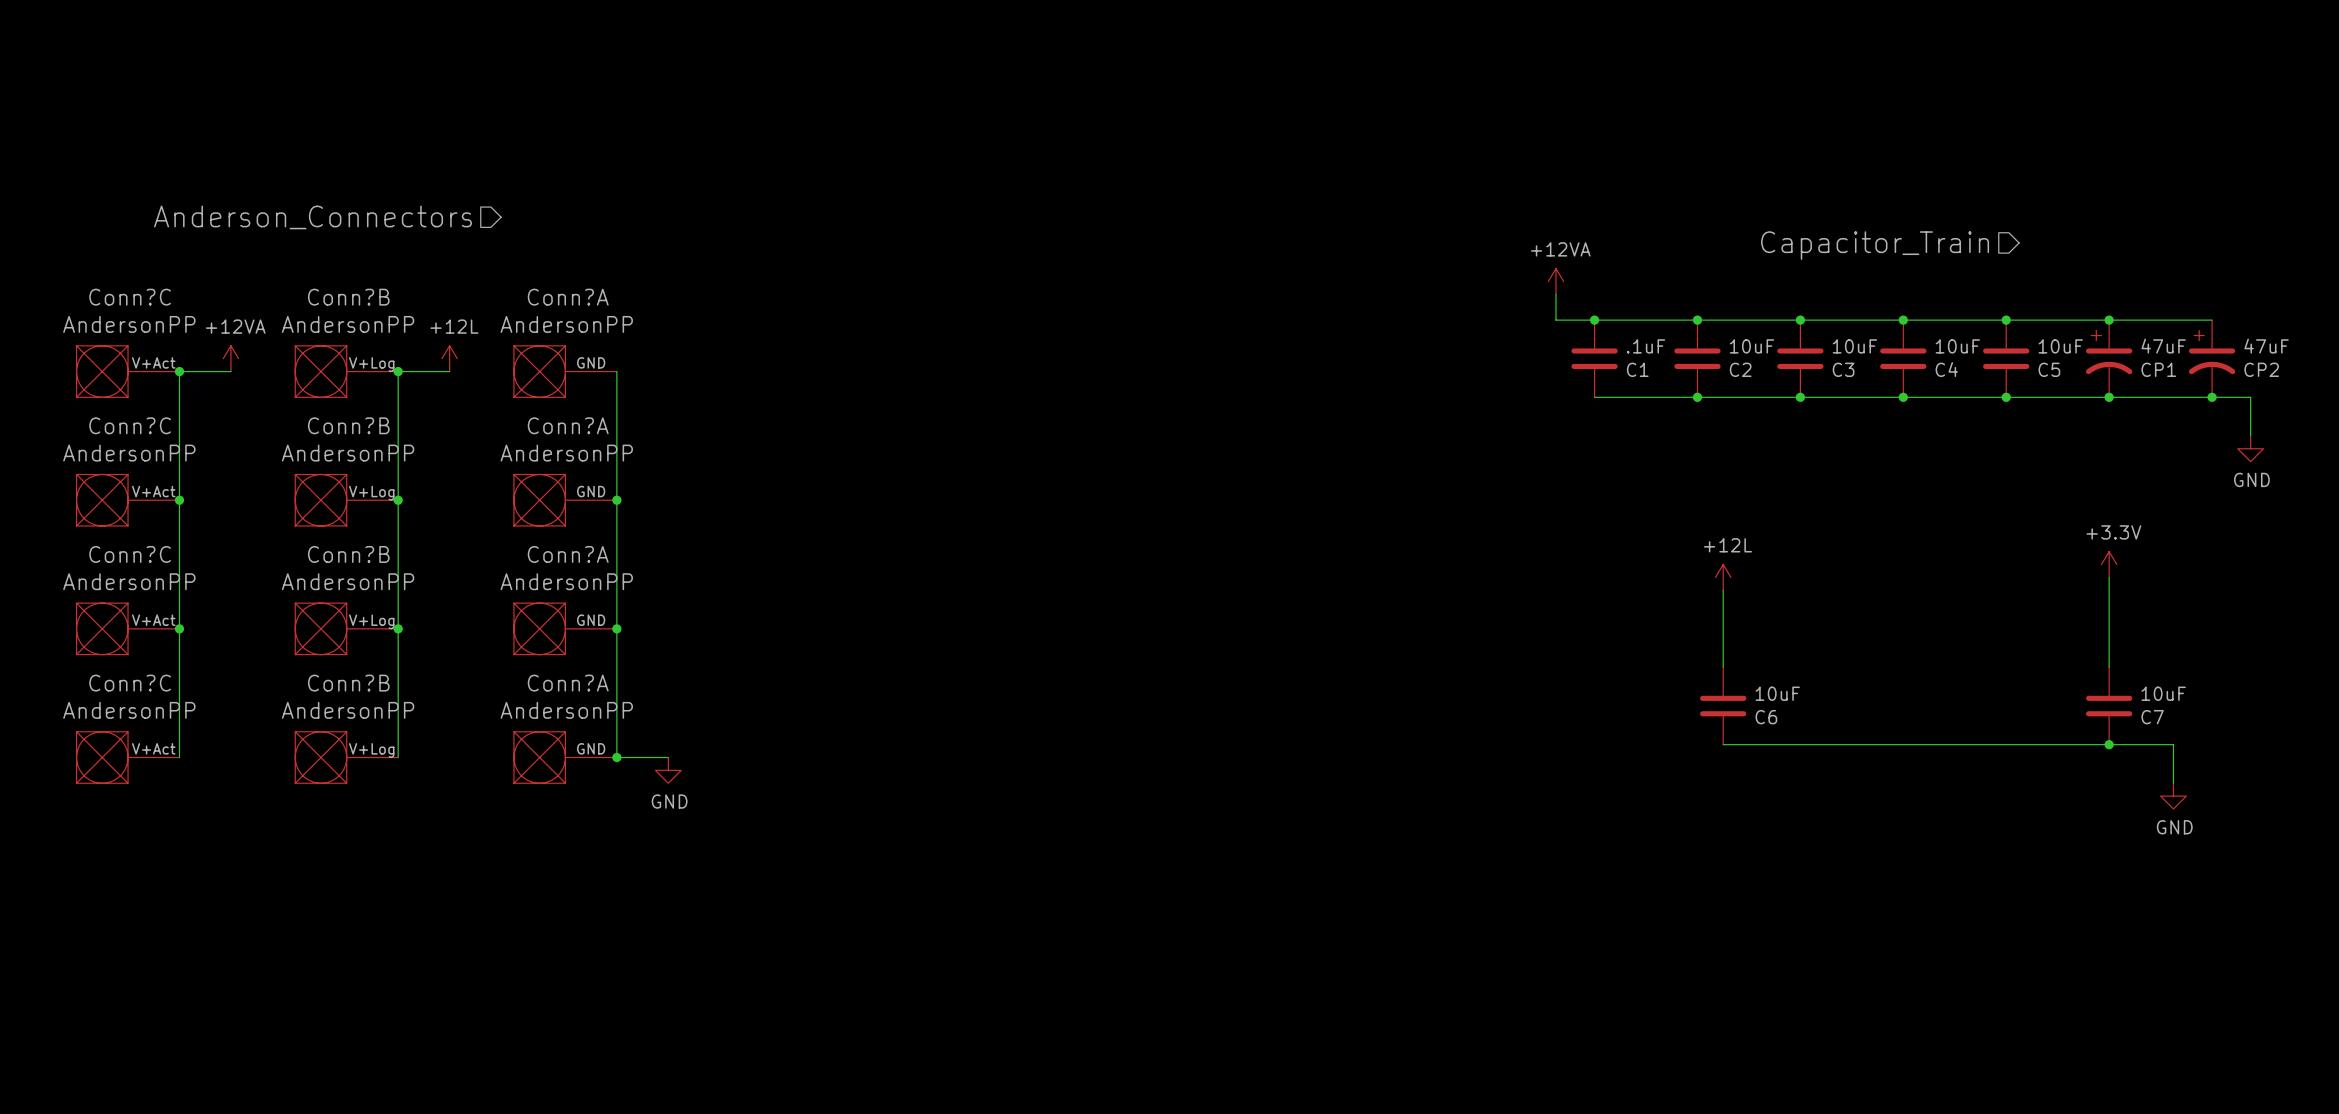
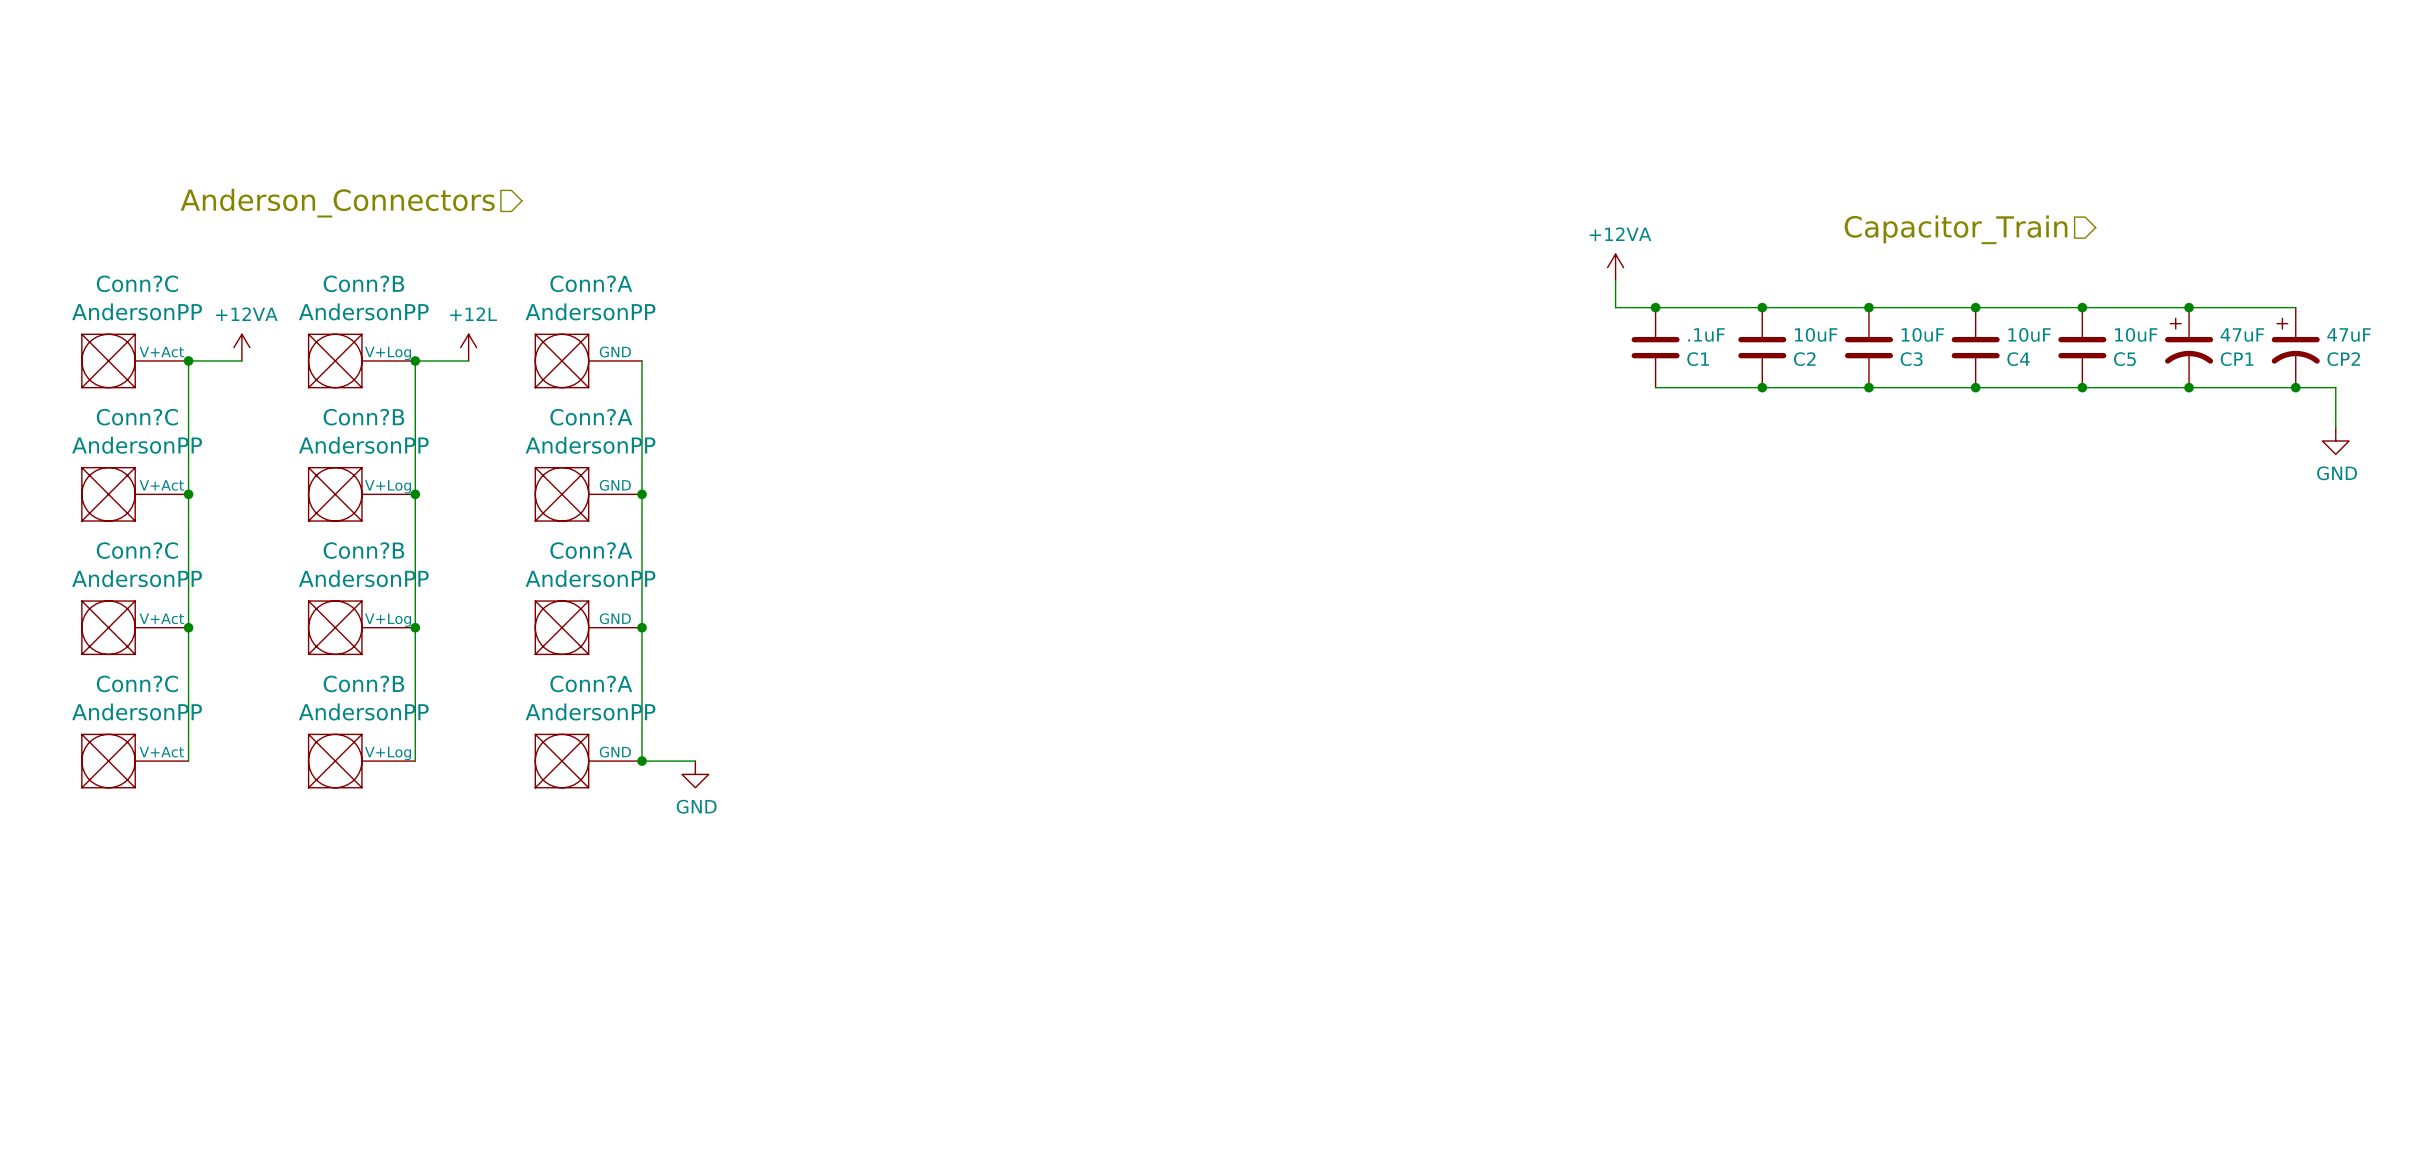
power symbol: +3.3V (2109, 564) -> none
power symbol: +12L (1723, 577) -> none
wire: (2109, 577) (2109, 667) -> none
wire: (1723, 590) (1723, 667) -> none
10uF: C6 (1723, 706) -> none
10uF: C7 (2109, 706) -> none
wire: (1723, 744) (2173, 744) (2173, 783) -> none
junction: (2109, 744) -> none
power symbol: GND (2173, 796) -> none

